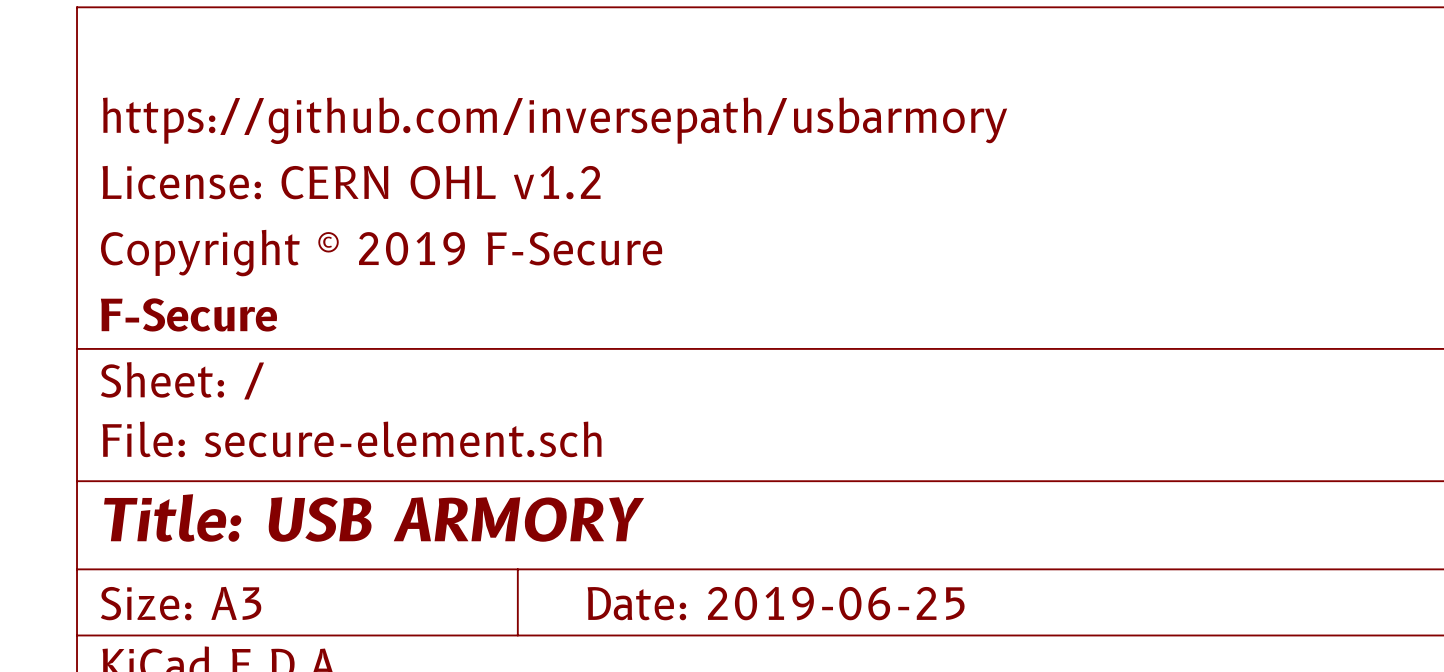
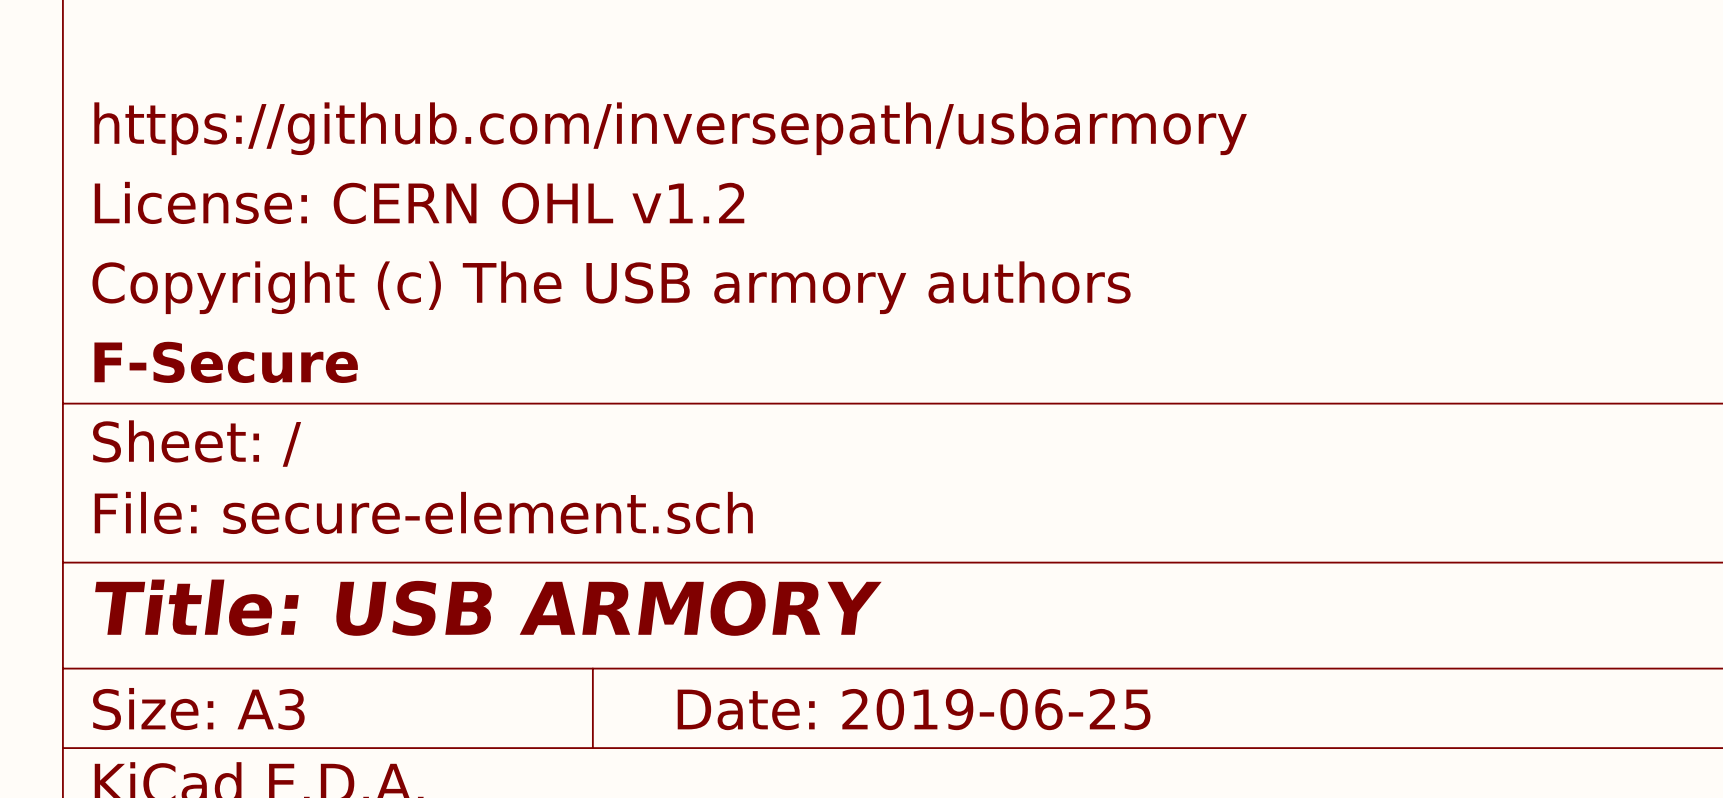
title block: Copyright © 2019 F-Secure (381, 253) -> Copyright (c) The USB armory authors (611, 287)

